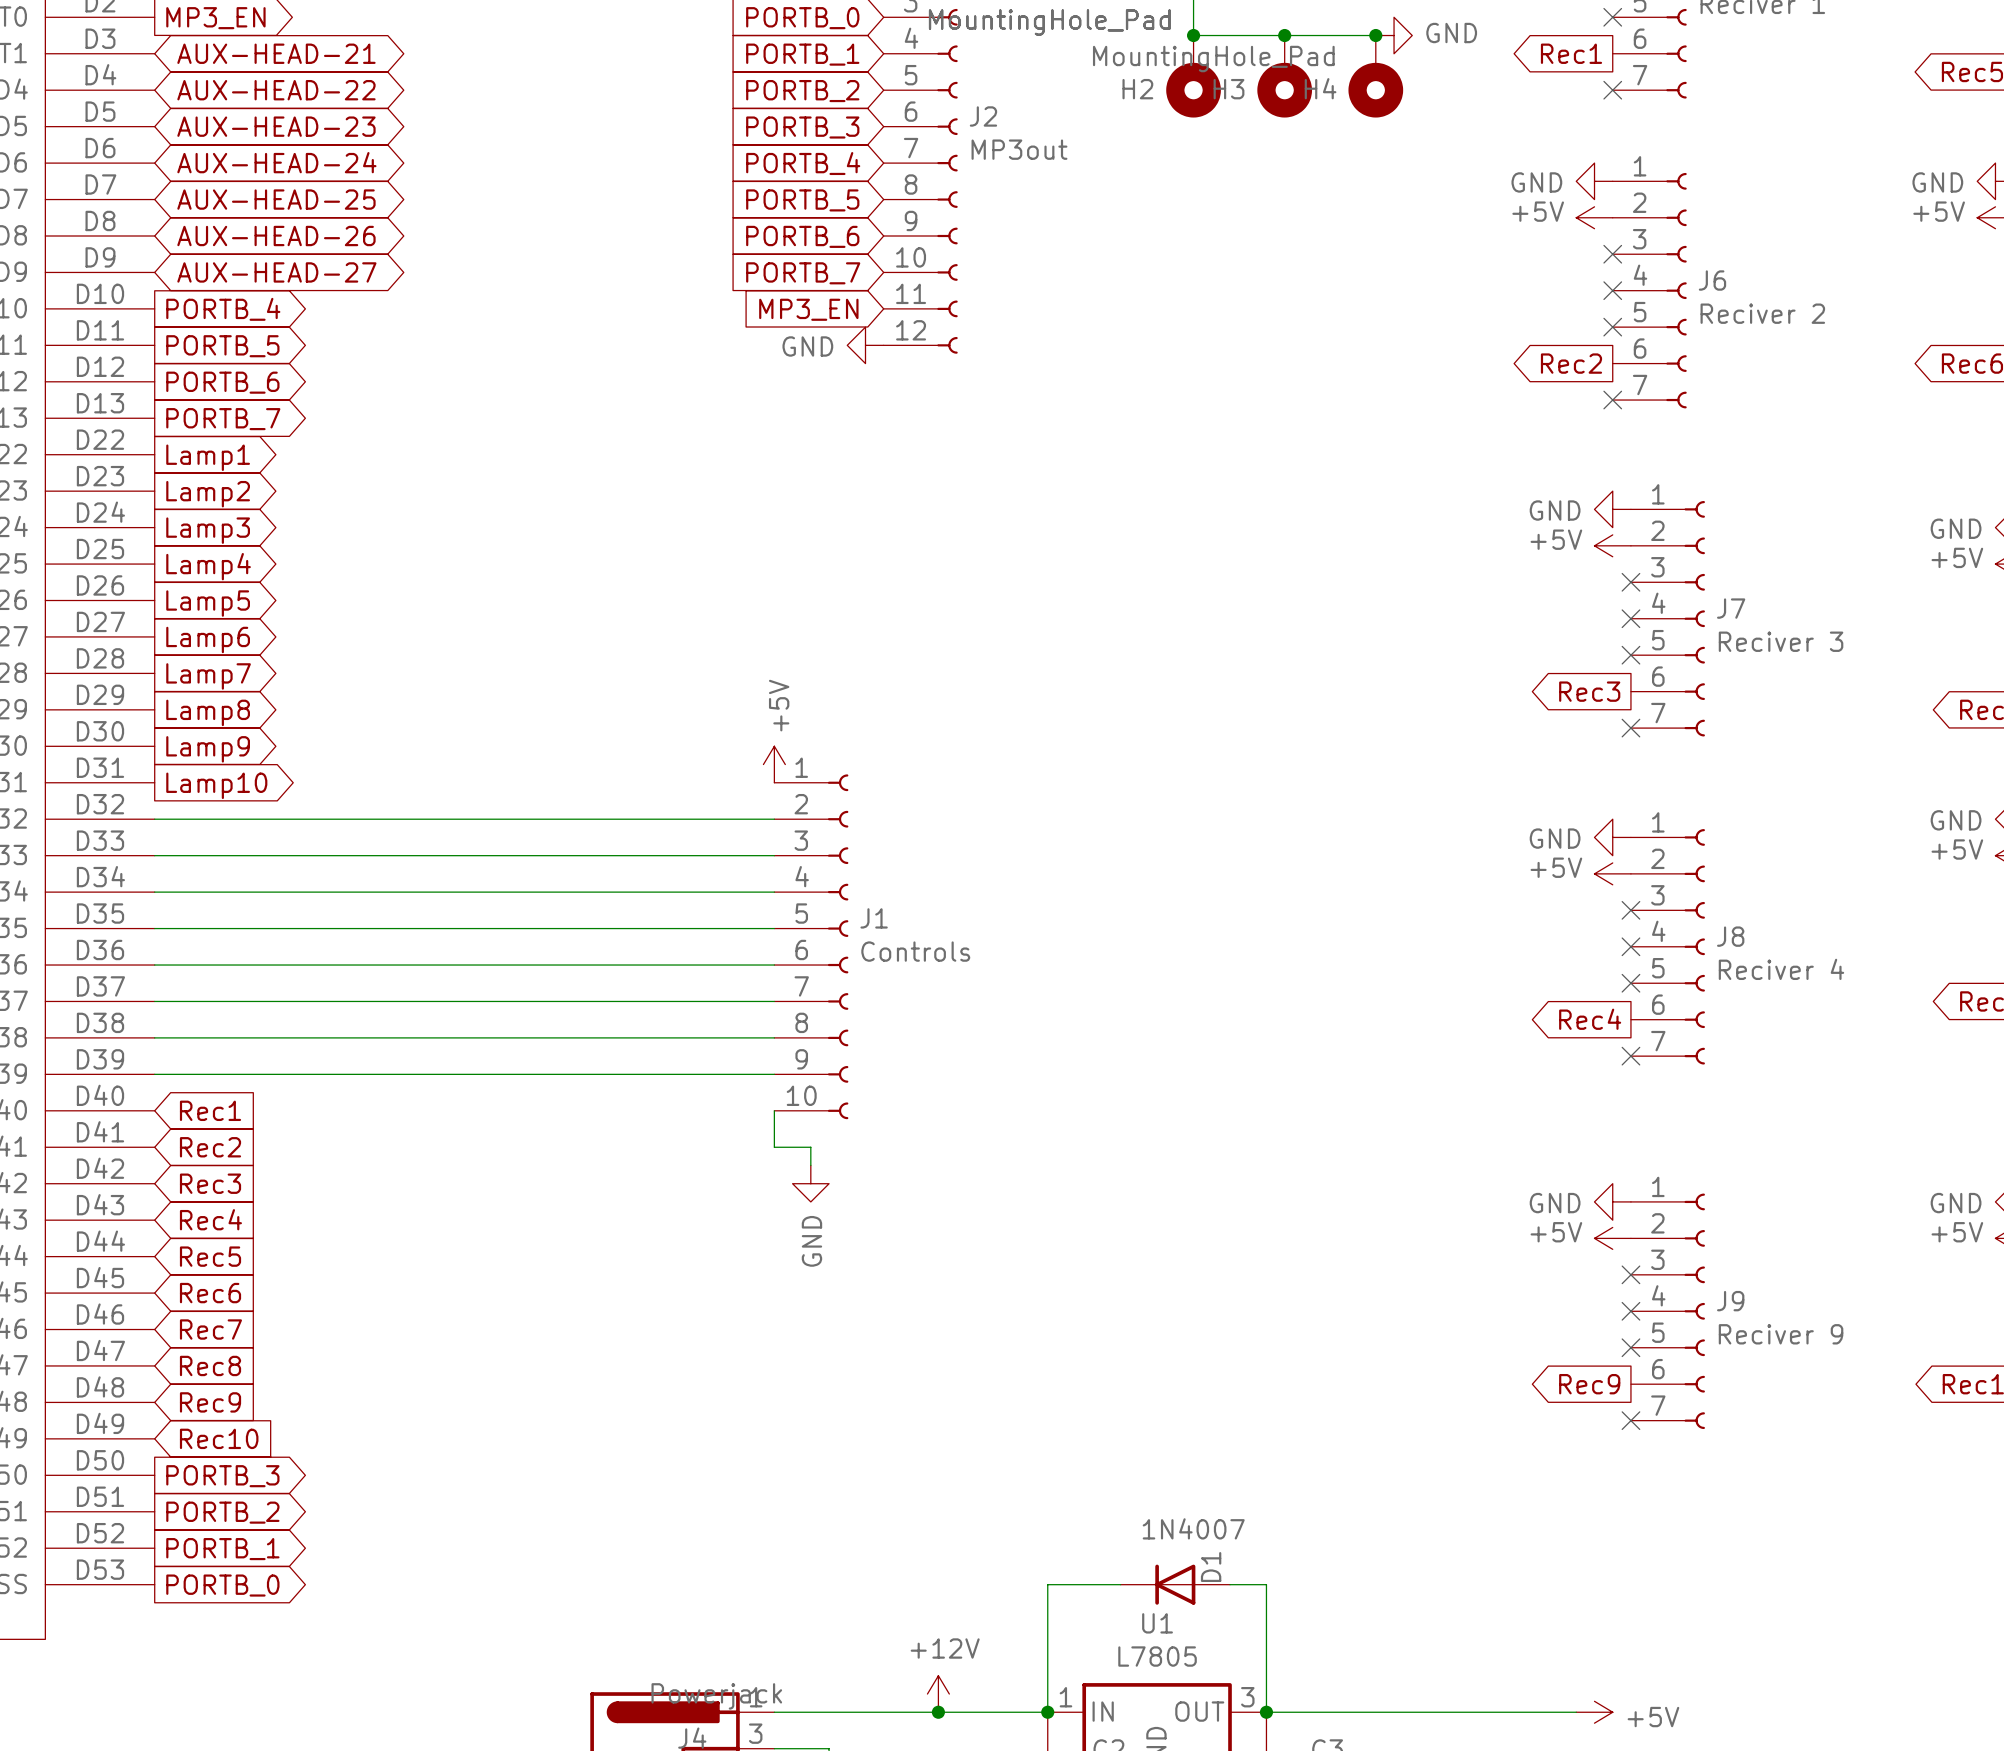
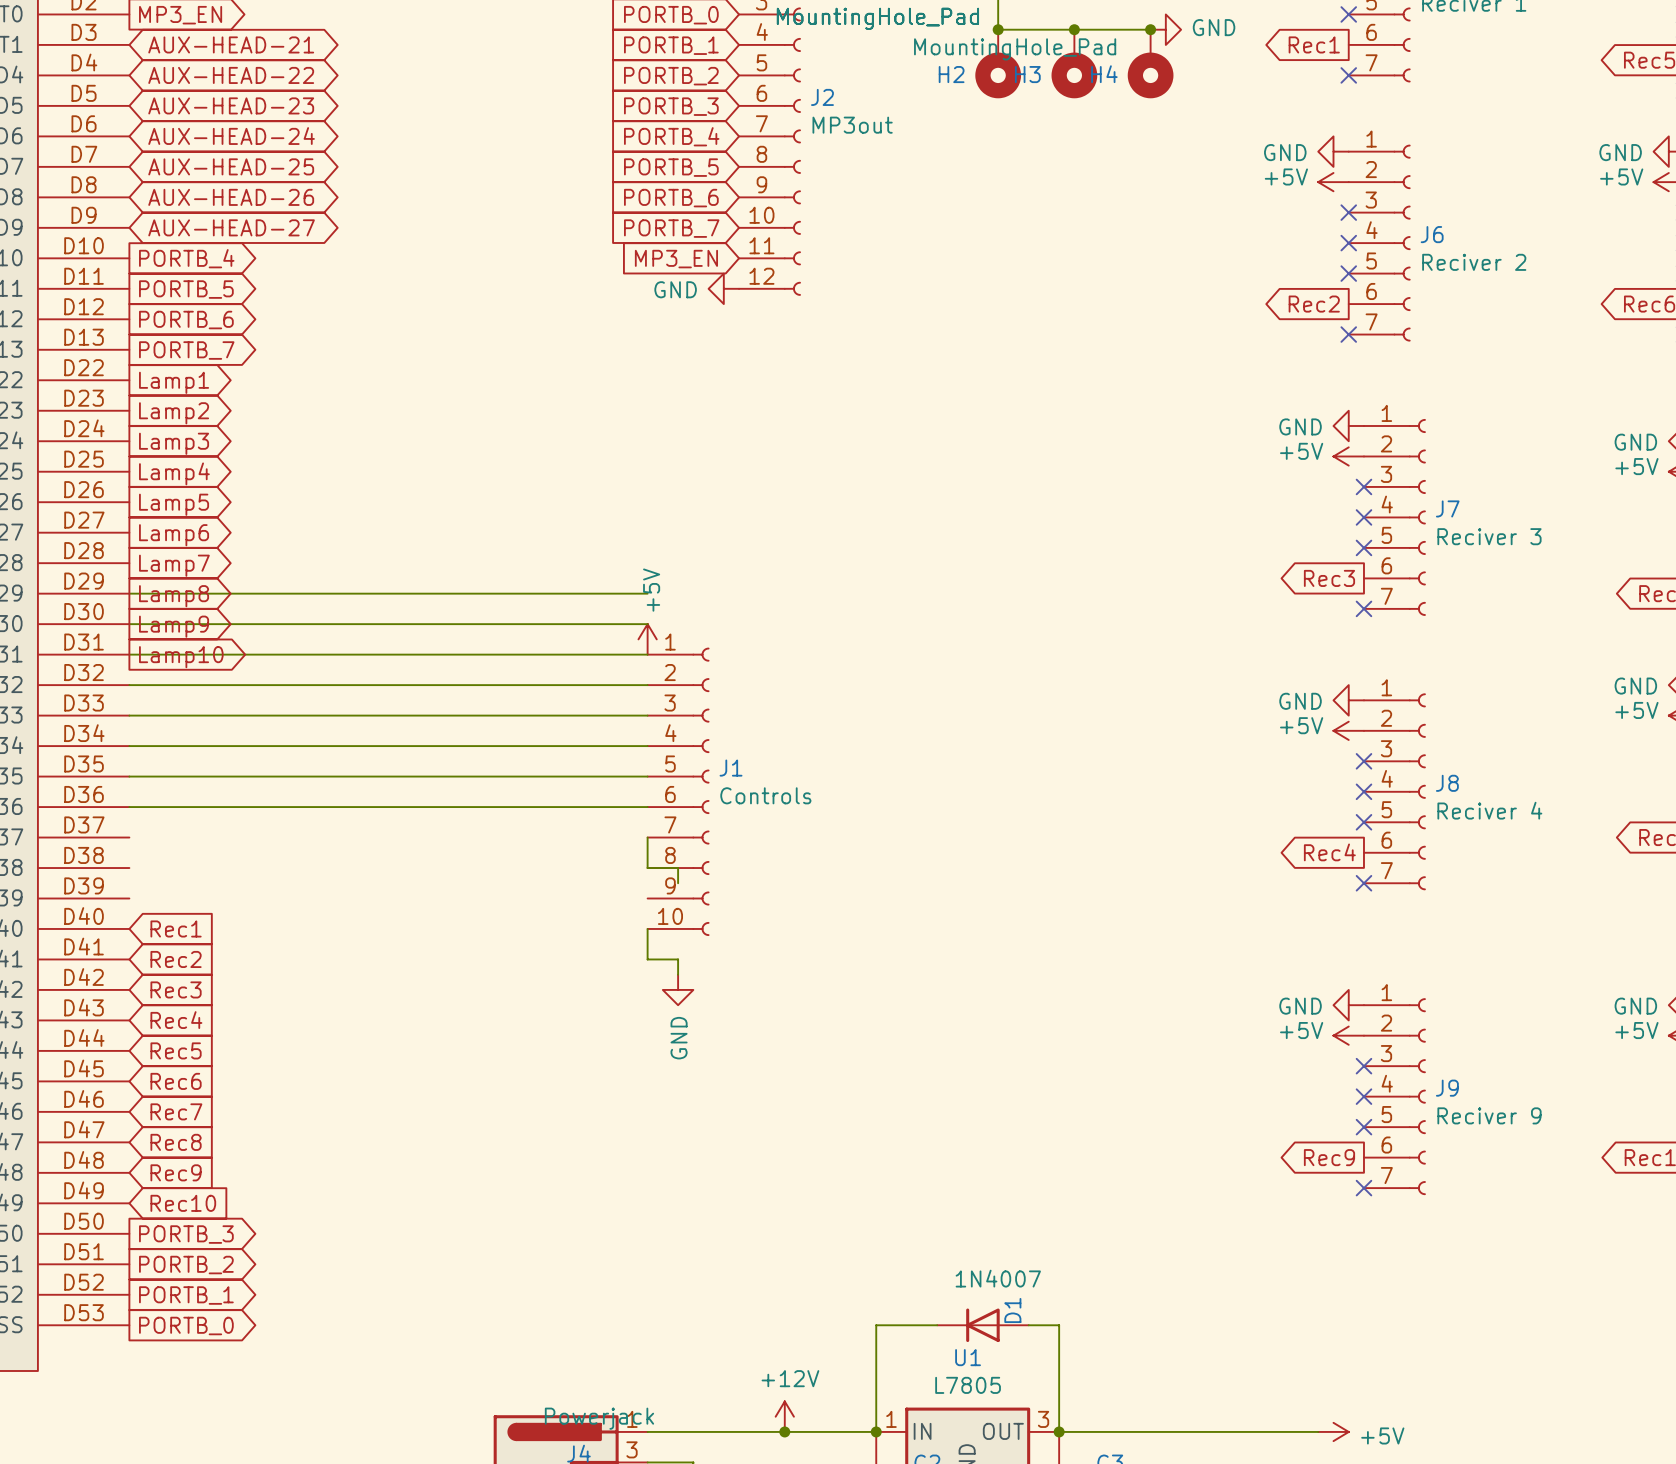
wire: none -> (129, 593) (647, 593)
wire: (154, 1001) (774, 1001) -> (678, 883) (678, 868) (647, 868) (647, 837)
wire: (154, 1037) (774, 1037) -> (129, 624) (647, 624)
wire: (154, 1074) (774, 1074) -> (129, 654) (647, 654)

